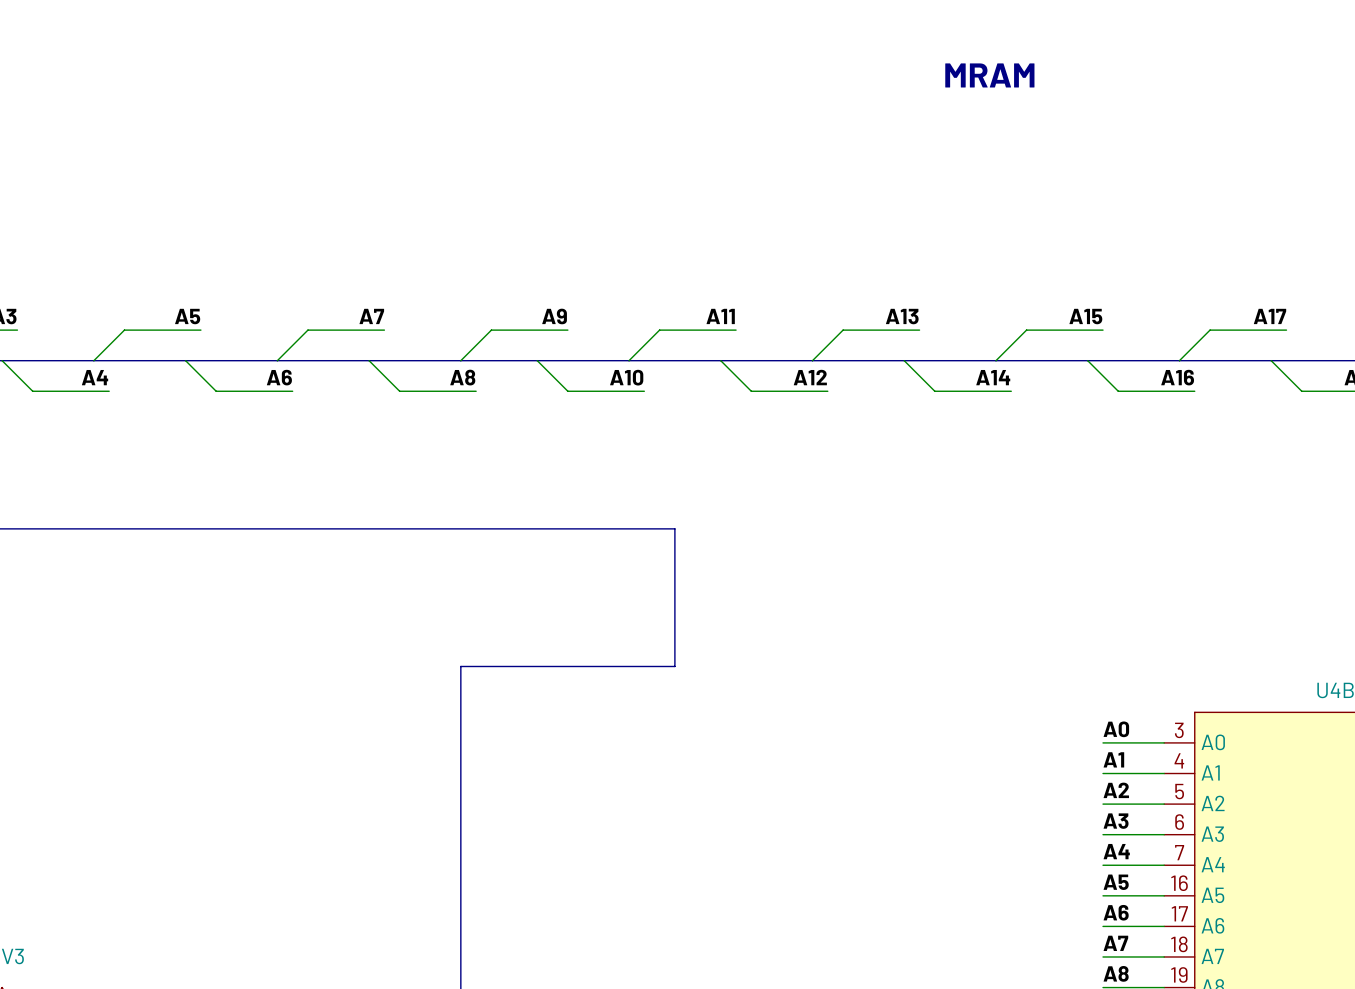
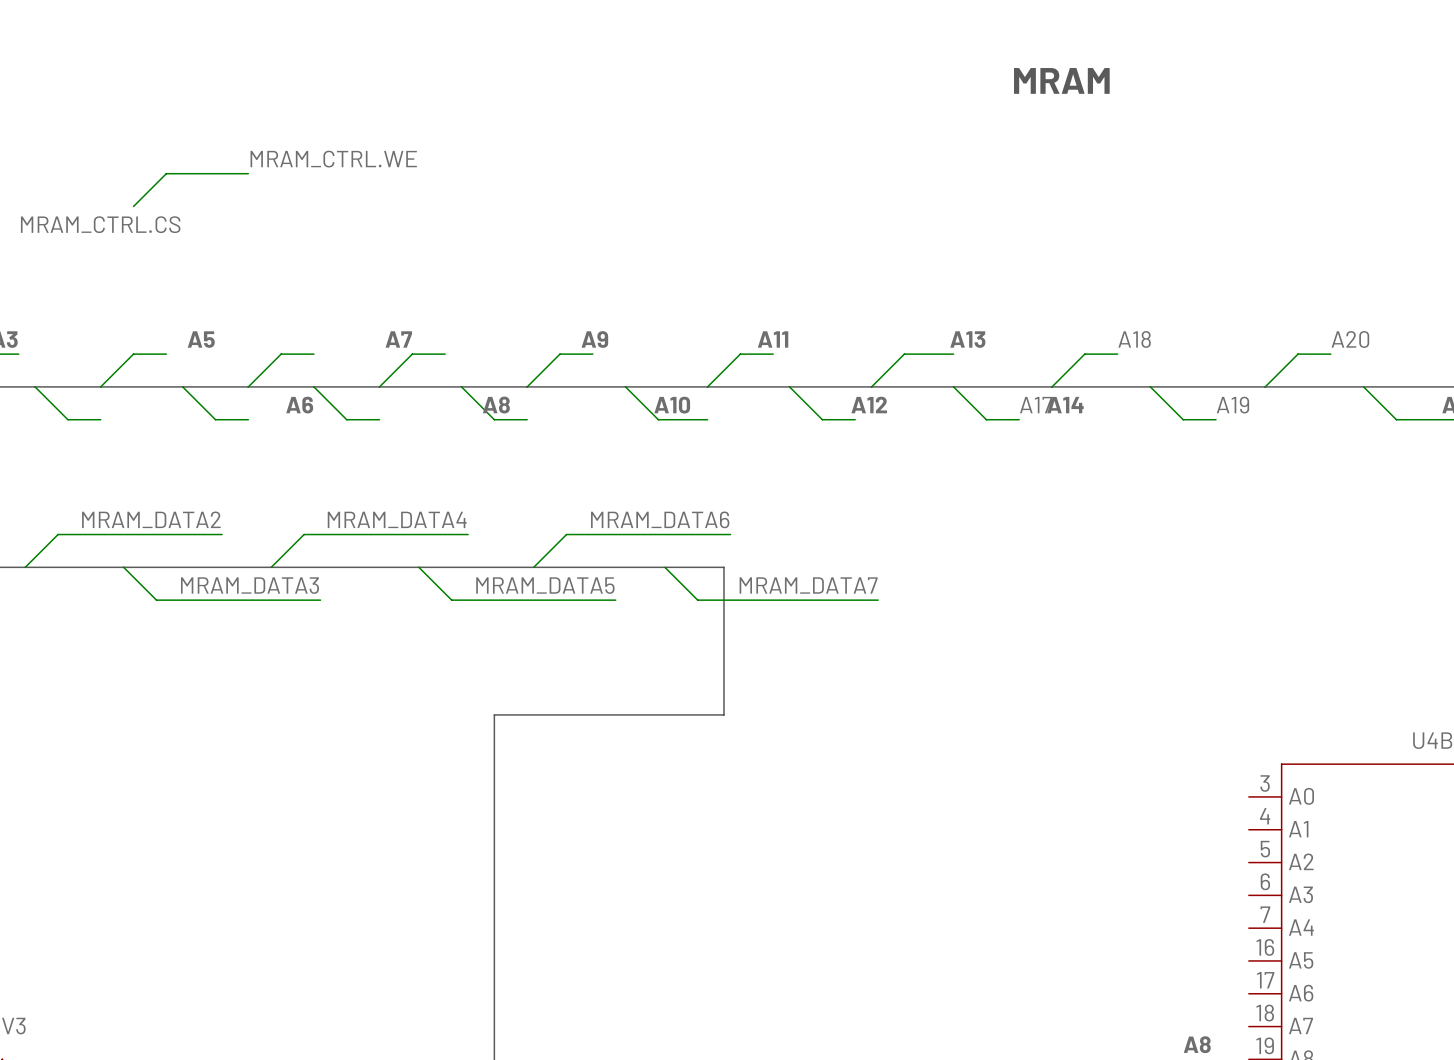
label: none -> MRAM_CTRL.WE (333, 159)
label: none -> MRAM_CTRL.CS (100, 224)
label: A15 (1085, 316) -> A18 (1134, 339)
label: none -> A20 (1350, 339)
label: A17 (1270, 316) -> none
wire: (155, 330) (200, 330) -> none
wire: none -> (313, 354) (281, 354) (248, 386)
wire: (384, 330) (307, 330) (277, 360) -> (248, 173) (166, 173) (133, 206)
wire: none -> (445, 354) (412, 354) (379, 386)
wire: (522, 330) (491, 330) (460, 360) -> (559, 354) (527, 386)
wire: (552, 330) (567, 330) -> (510, 419) (527, 419)
wire: (690, 330) (659, 330) (629, 360) -> (740, 354) (707, 386)
wire: (720, 330) (736, 330) -> (691, 419) (707, 419)
wire: (888, 330) (919, 330) -> none
wire: (1026, 330) (995, 360) -> (1101, 354) (1084, 354) (1052, 386)
wire: (1041, 330) (1103, 330) -> none
wire: (1240, 330) (1286, 330) -> none
wire: (2, 360) (32, 391) (63, 391) -> (35, 386) (67, 419)
wire: (185, 360) (216, 391) -> (182, 386) (215, 419) (231, 419)
wire: none -> (313, 386) (346, 419) (379, 419)
wire: (369, 360) (399, 391) (460, 391) -> (461, 386) (494, 419)
wire: (537, 360) (567, 391) (613, 391) -> (625, 386) (658, 419)
wire: (720, 360) (751, 391) (766, 391) -> (789, 386) (822, 419)
wire: (904, 360) (934, 391) -> (953, 386) (986, 419) (1002, 419)
wire: (1087, 360) (1118, 391) -> (1150, 386) (1183, 419) (1199, 419)
label: A4 (95, 377) -> none
label: none -> A17 (1036, 405)
label: A16 (1177, 377) -> A19 (1232, 405)
wire: (93, 391) (109, 391) -> none
wire: (231, 391) (292, 391) -> none
wire: (797, 391) (827, 391) -> none
wire: (950, 391) (1011, 391) -> none
wire: (1133, 391) (1194, 391) -> none
label: none -> MRAM_DATA2 (151, 519)
label: none -> MRAM_DATA4 (397, 519)
label: none -> MRAM_DATA6 (660, 519)
wire: none -> (222, 534) (58, 534) (25, 567)
wire: none -> (468, 534) (304, 534) (271, 567)
wire: none -> (730, 534) (566, 534) (533, 567)
wire: none -> (123, 567) (156, 600) (320, 600)
wire: none -> (418, 567) (451, 600) (615, 600)
wire: none -> (664, 567) (697, 600) (878, 600)
label: none -> MRAM_DATA3 (249, 585)
label: none -> MRAM_DATA5 (545, 585)
label: none -> MRAM_DATA7 (808, 585)
label: A0 (1116, 729) -> none
wire: (1103, 742) (1164, 742) -> none
label: A1 (1113, 759) -> none
wire: (1103, 773) (1164, 773) -> none
label: A2 (1116, 790) -> none
wire: (1103, 804) (1164, 804) -> none
label: A3 (1116, 821) -> none
wire: (1103, 834) (1164, 834) -> none
label: A4 (1116, 851) -> none
wire: (1103, 865) (1164, 865) -> none
label: A5 (1116, 882) -> none
wire: (1103, 895) (1164, 895) -> none
label: A6 (1116, 912) -> none
wire: (1103, 926) (1164, 926) -> none
label: A7 (1115, 943) -> none
wire: (1103, 956) (1164, 956) -> none
wire: (1103, 987) (1164, 987) -> none

